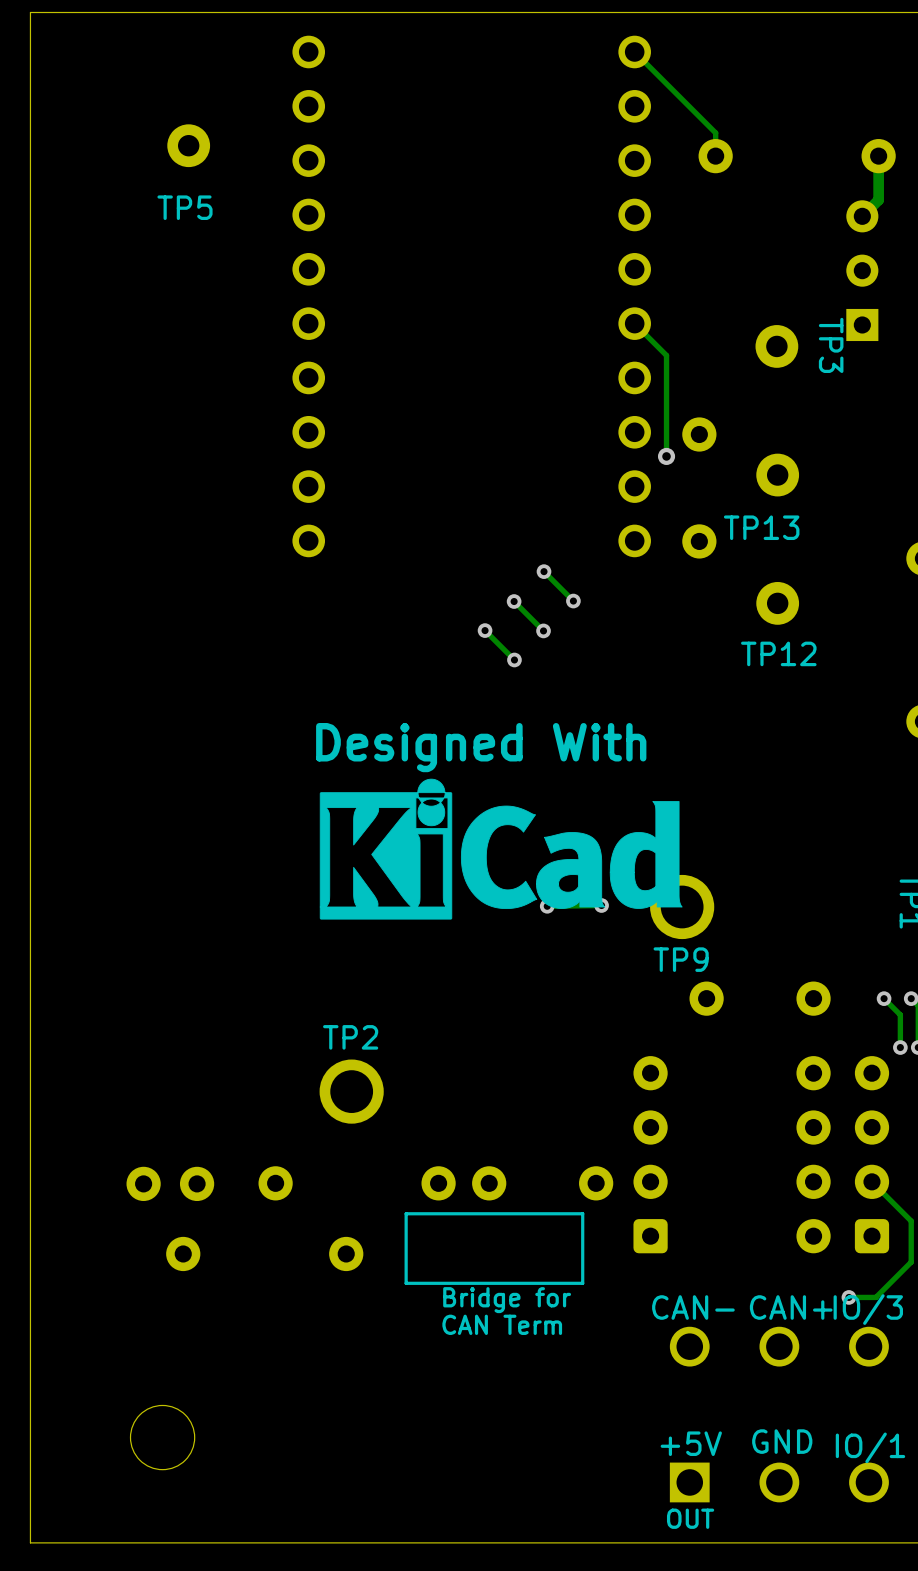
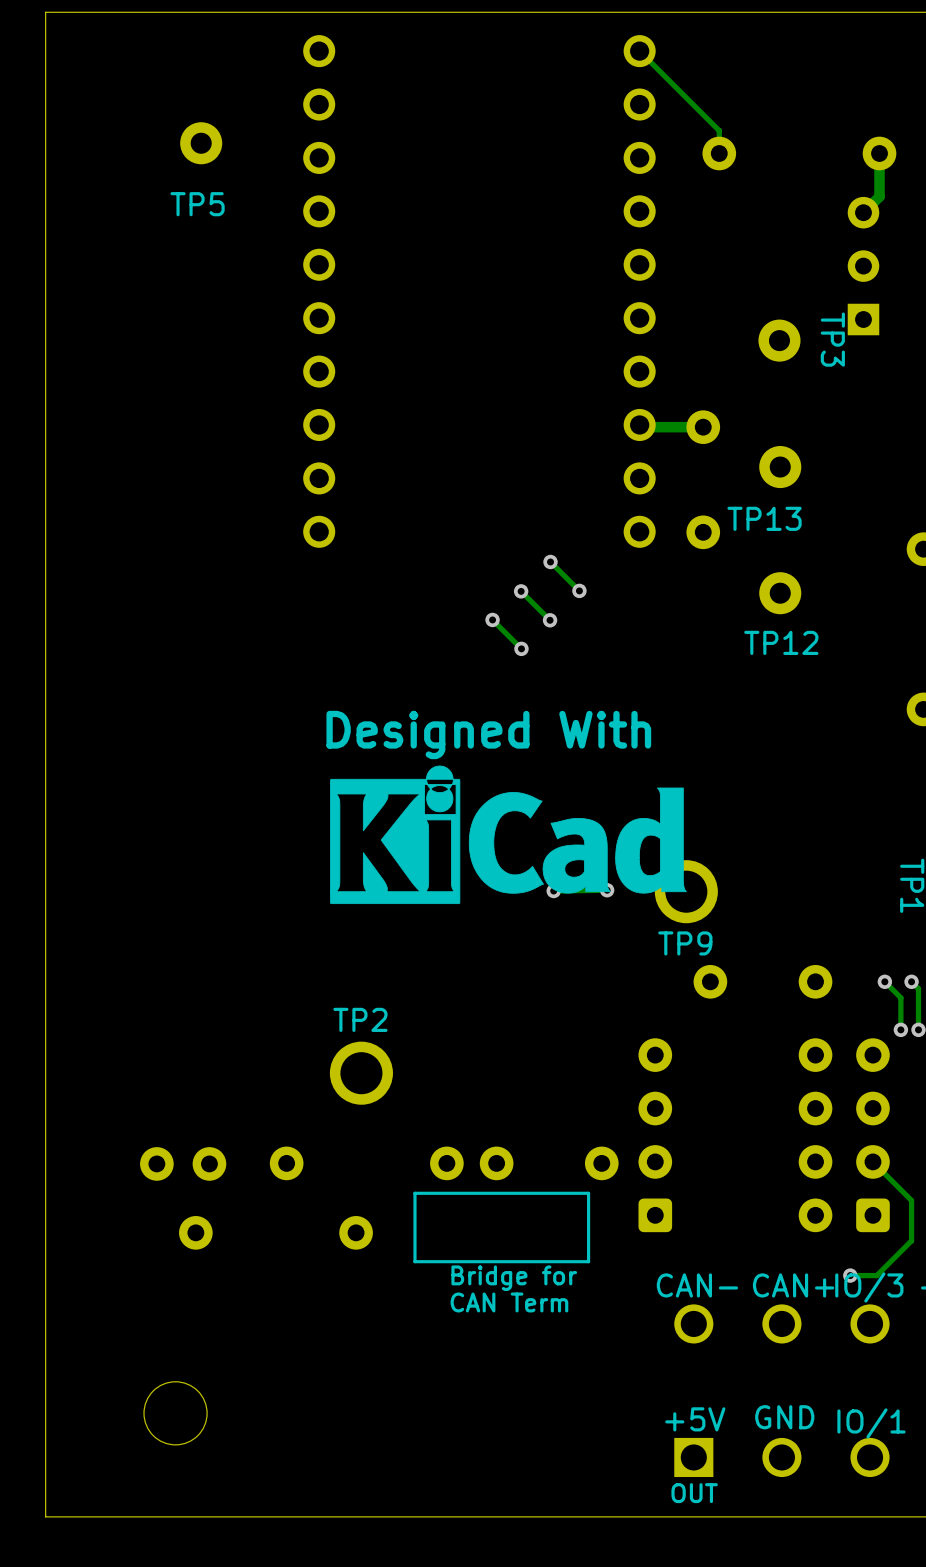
track: (634, 323) (666, 355) (666, 456) -> none
track: none -> (703, 427) (641, 427)
via: (666, 456) -> none

